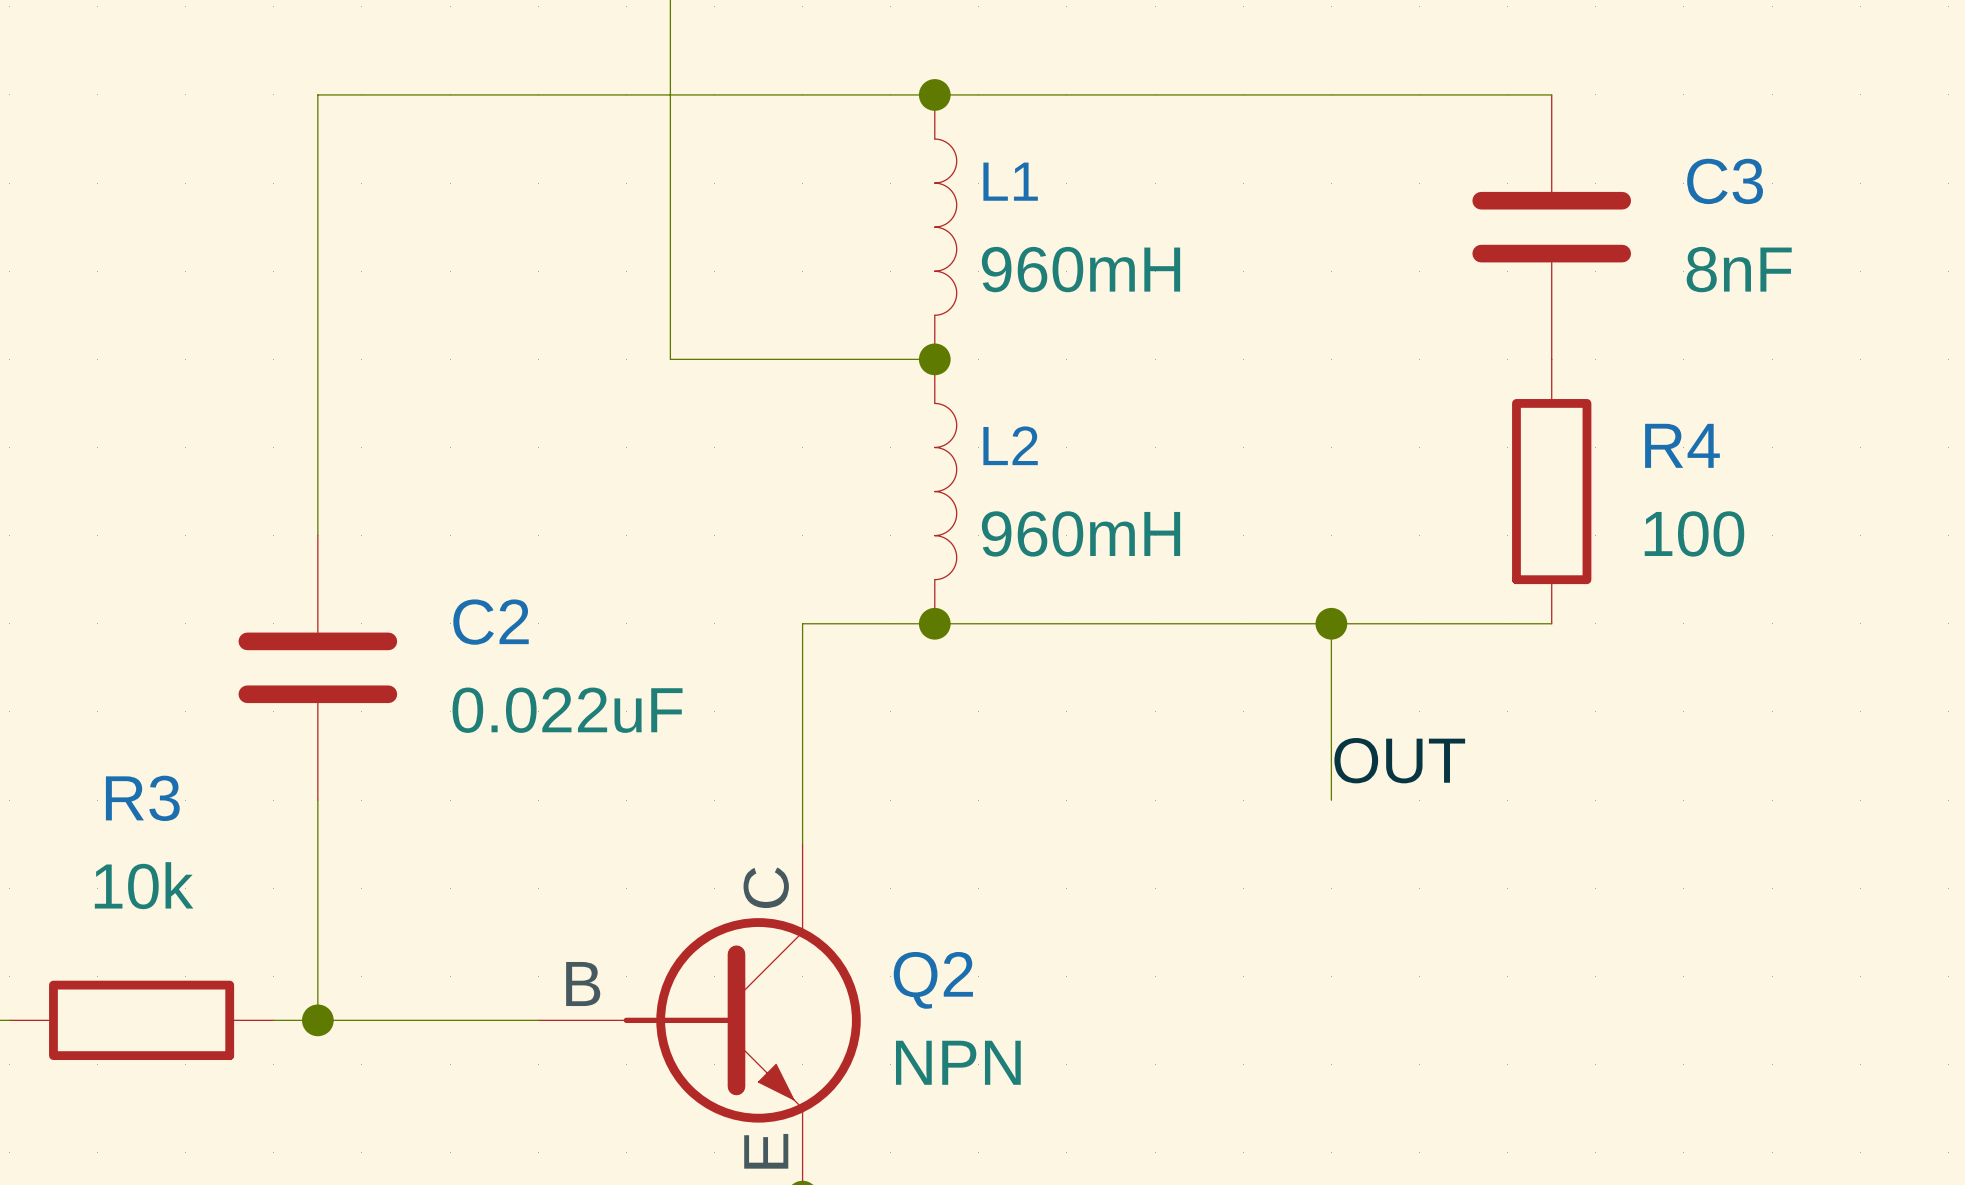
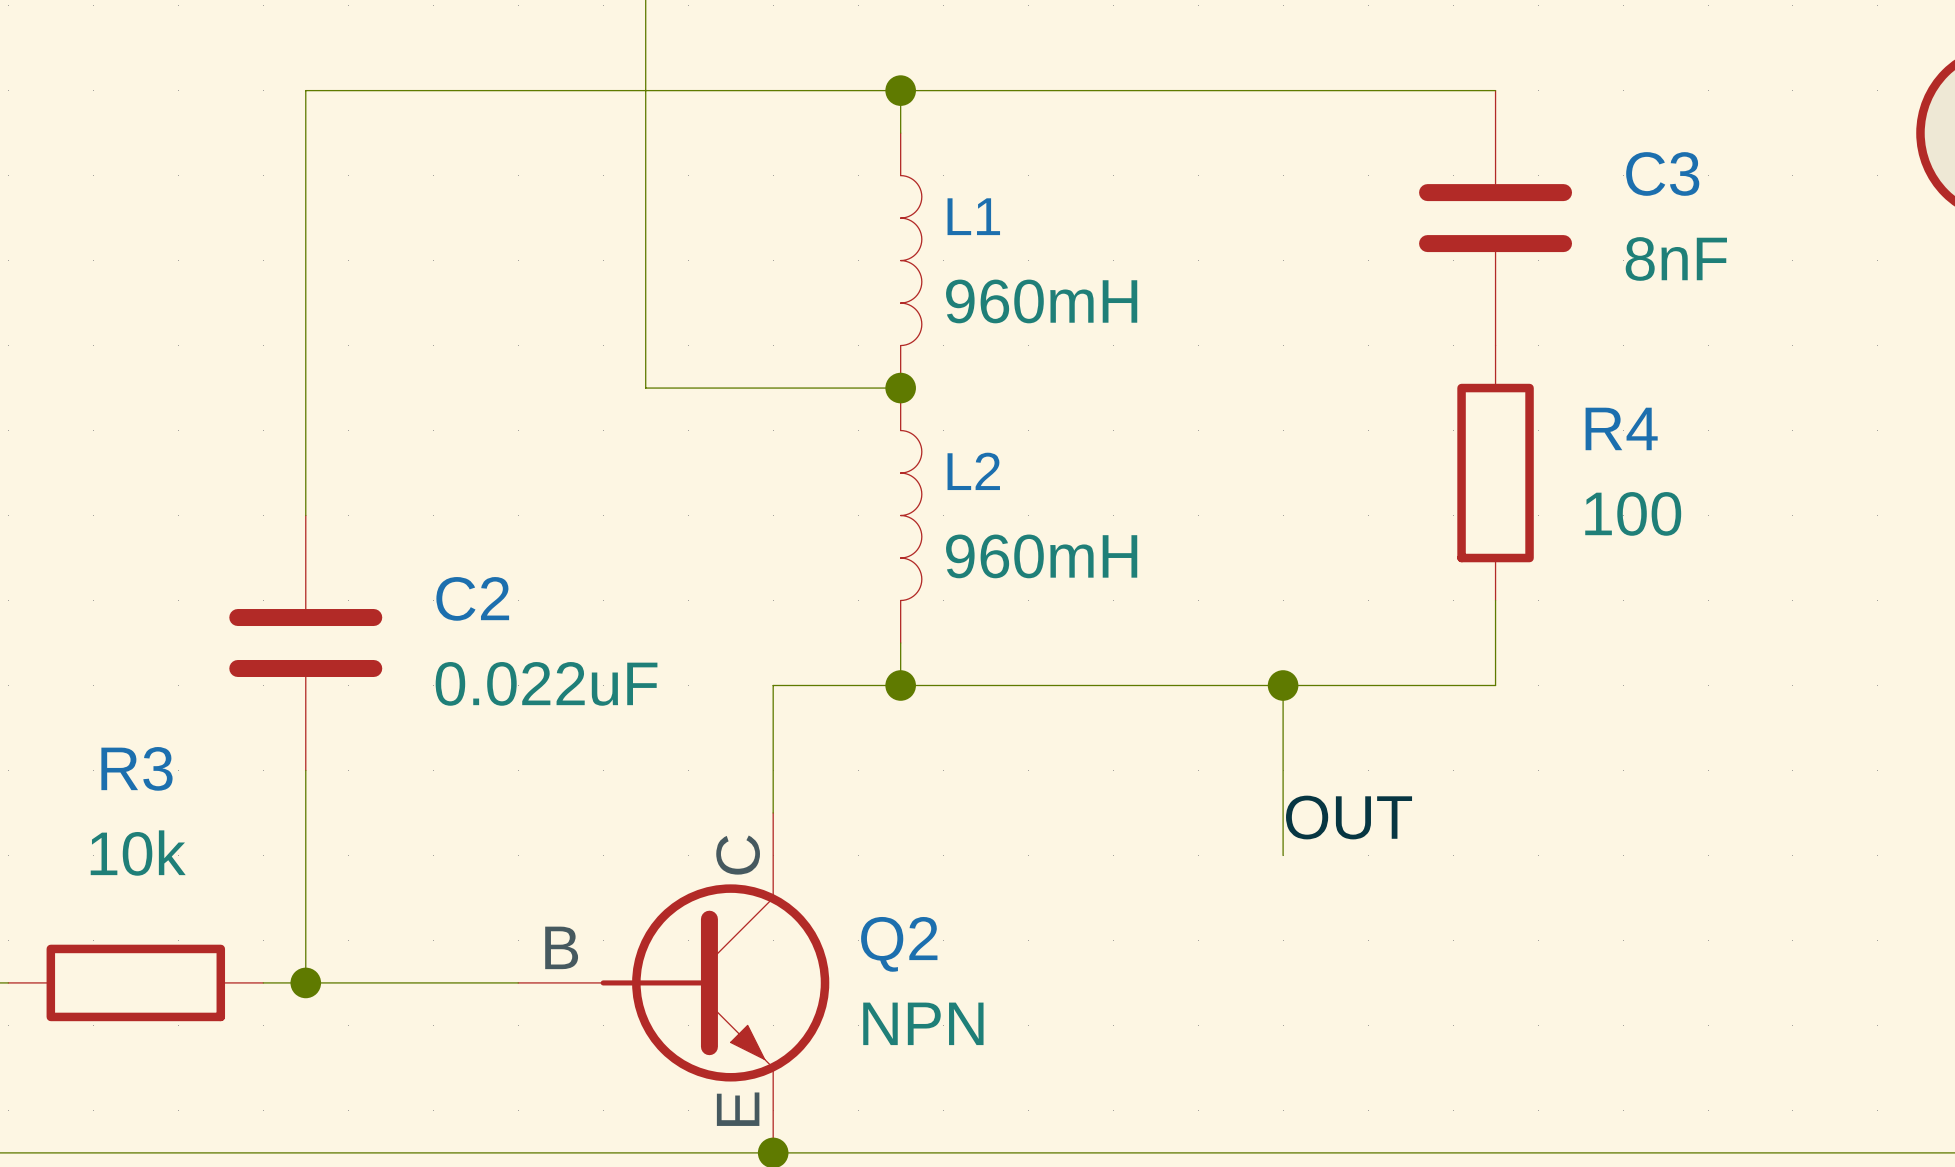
L1 position: (945, 227) -> (911, 260)
wire: (670, 359) (934, 359) -> (645, 345) (645, 388) (900, 388)
junction position: (934, 359) -> (900, 388)
L2 position: (945, 491) -> (911, 515)
junction position: (934, 623) -> (900, 685)
wire: (1331, 623) (1331, 711) -> (1283, 770) (1283, 855)
junction position: (1331, 623) -> (1283, 685)
wire: (1551, 623) (802, 623) (802, 711) -> (1495, 600) (1495, 685) (773, 685)
wire: none -> (900, 643) (900, 685)
label position: OUT (1399, 760) -> OUT (1349, 817)

